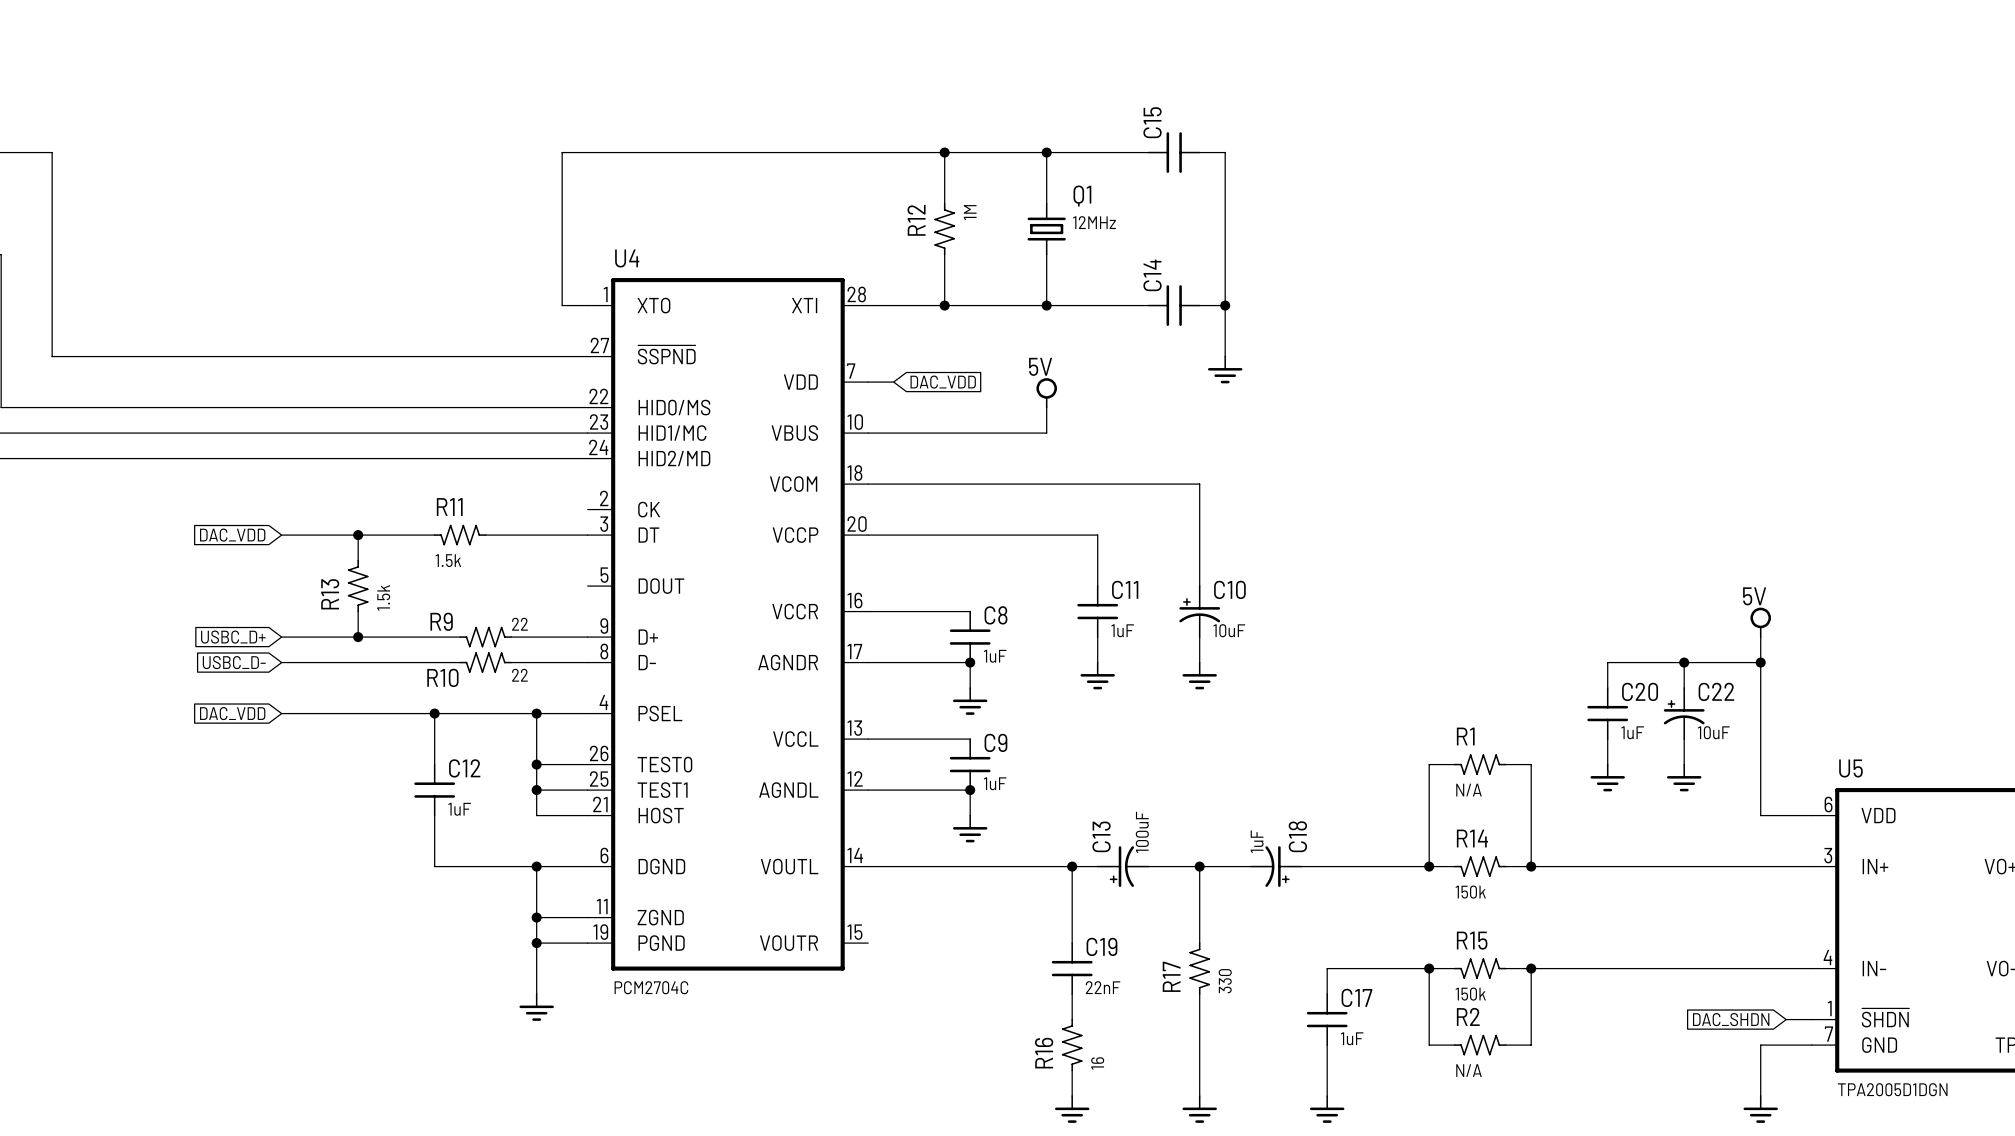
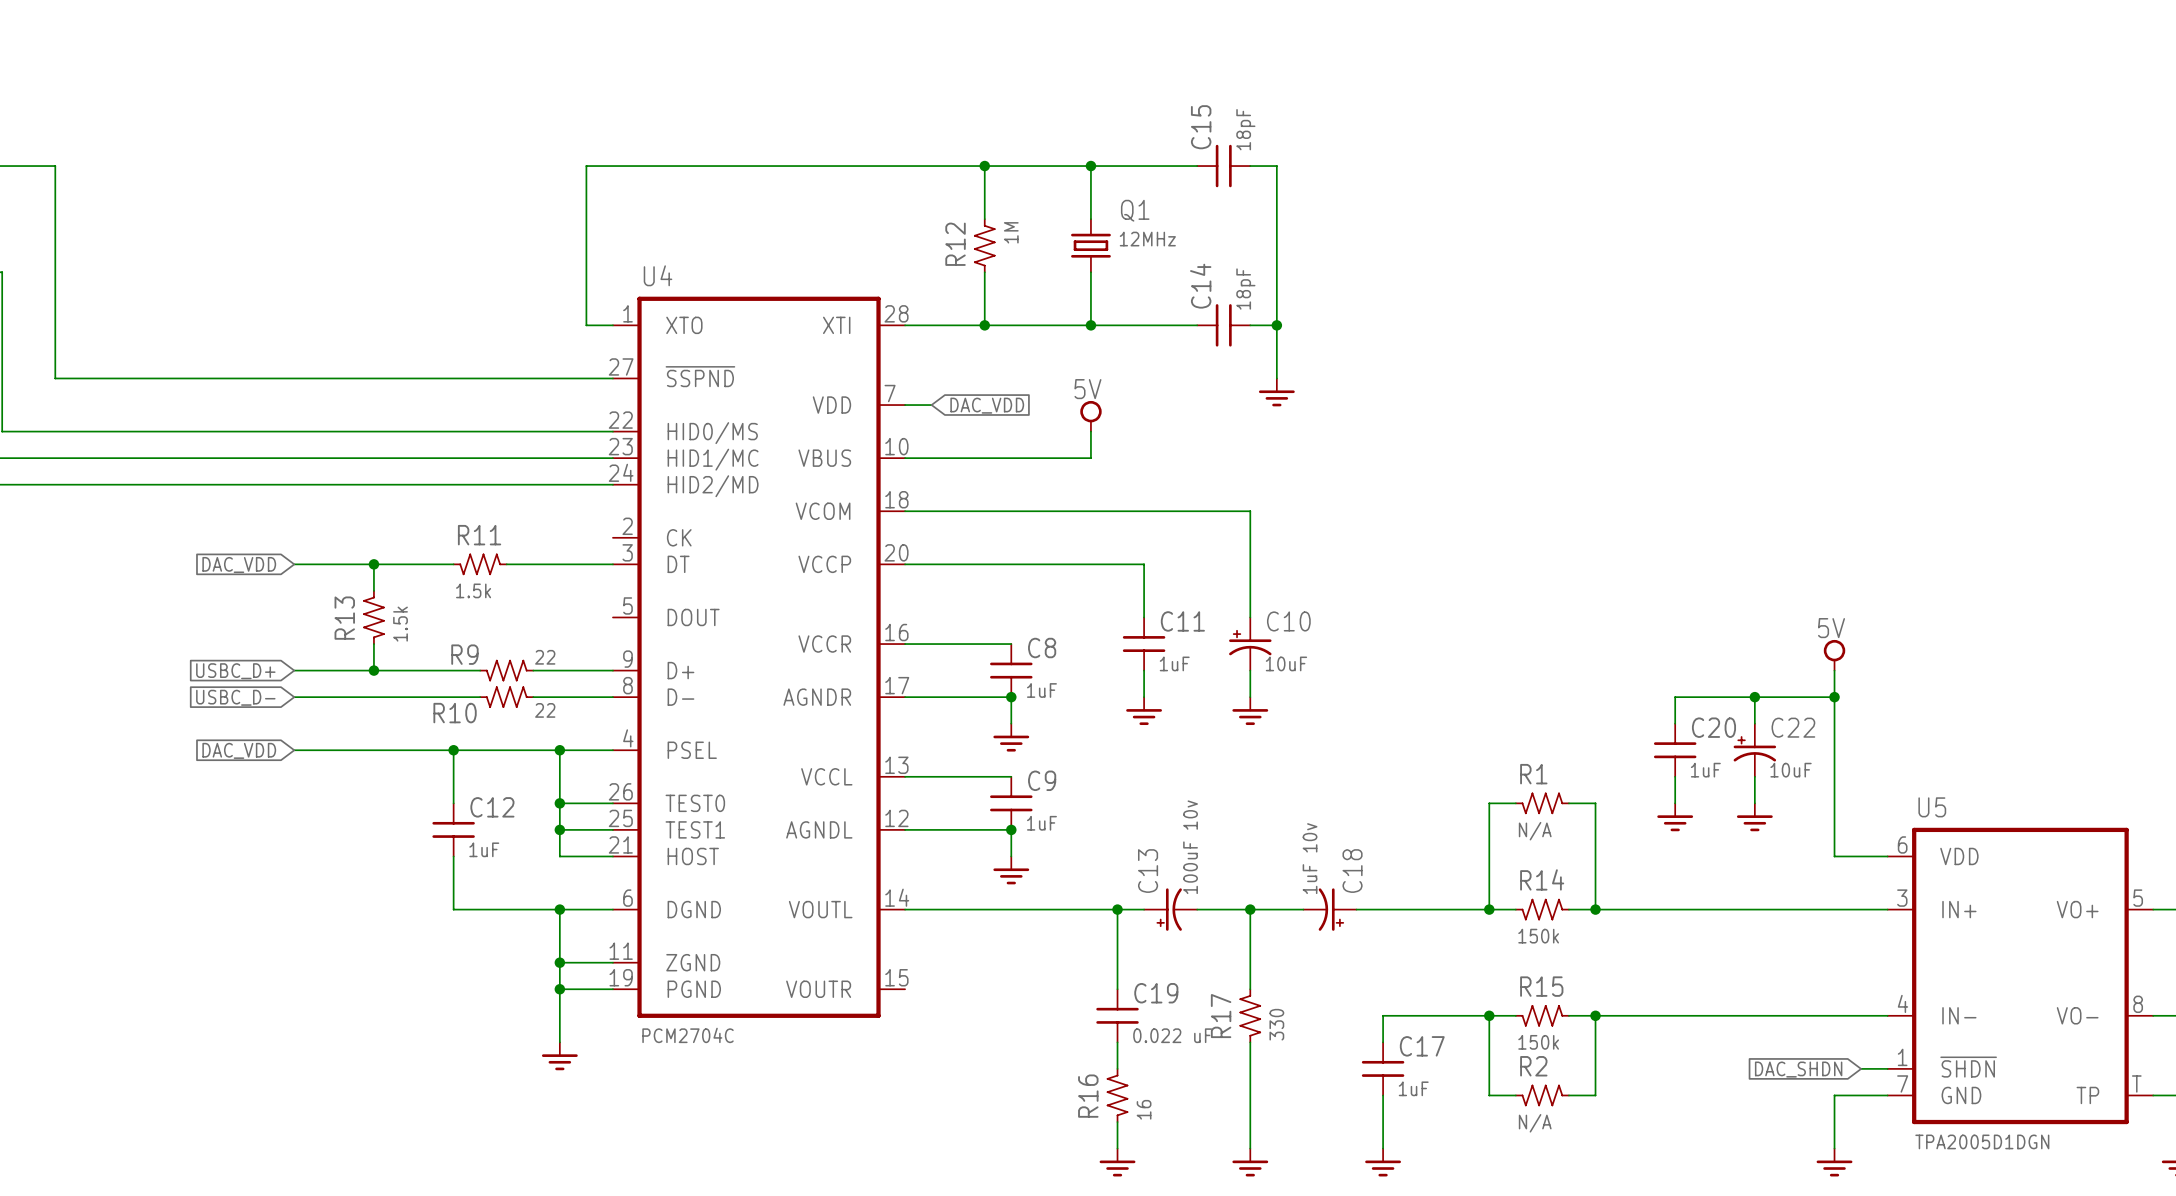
C15 value: none -> 18pF (1245, 129)
C14 value: none -> 18pF (1245, 289)
C13 value: 100uF (1142, 832) -> 100uF 10v (1190, 847)
C18 value: 1uF (1257, 841) -> 1uF 10v (1310, 858)
C19 value: 22nF (1103, 987) -> 0.022 uF (1172, 1035)

